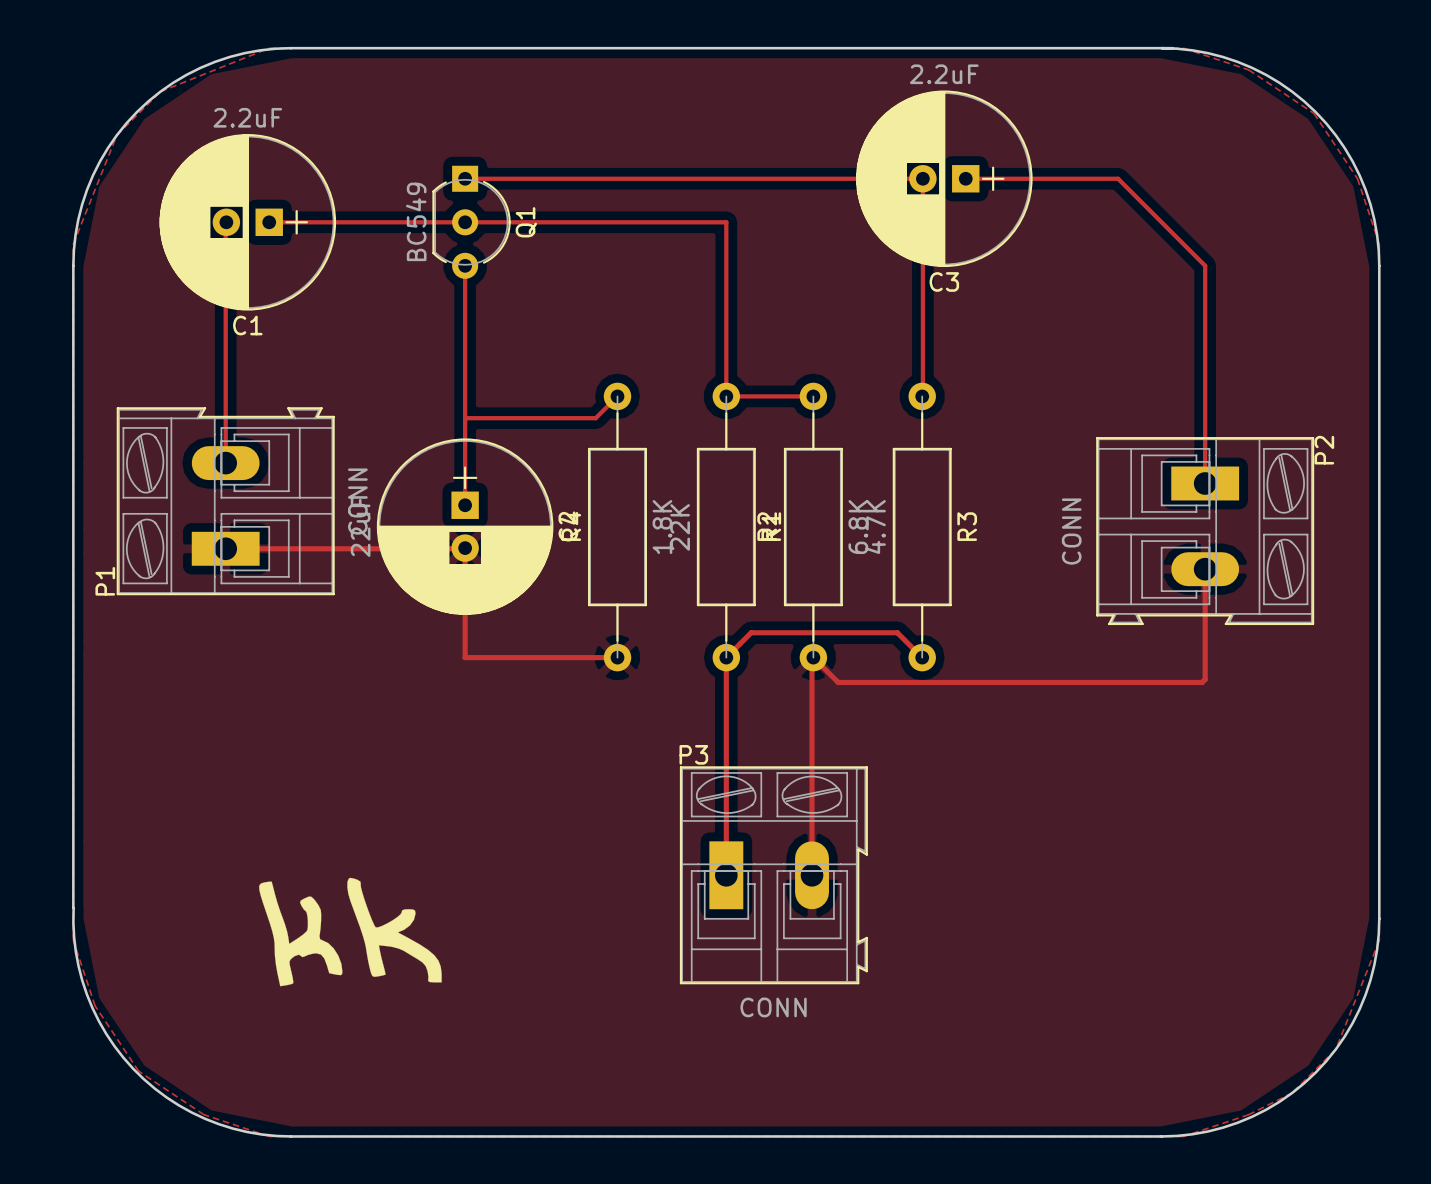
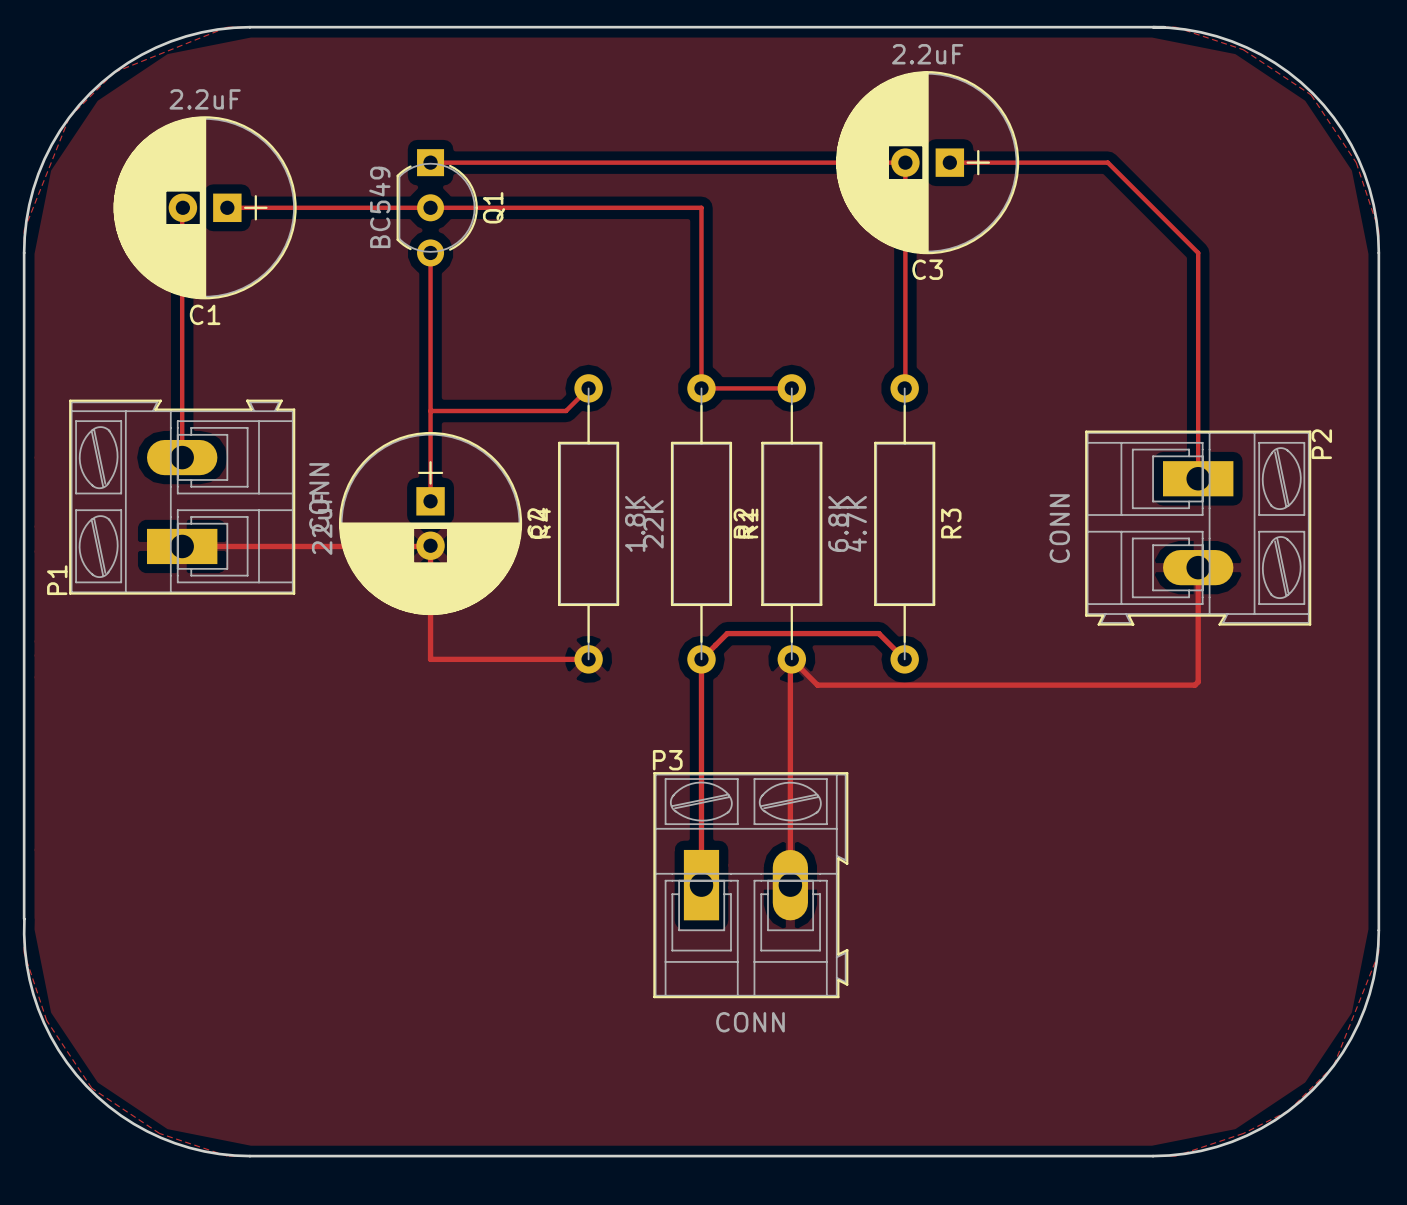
drawing: [259, 877, 442, 987] -> none

